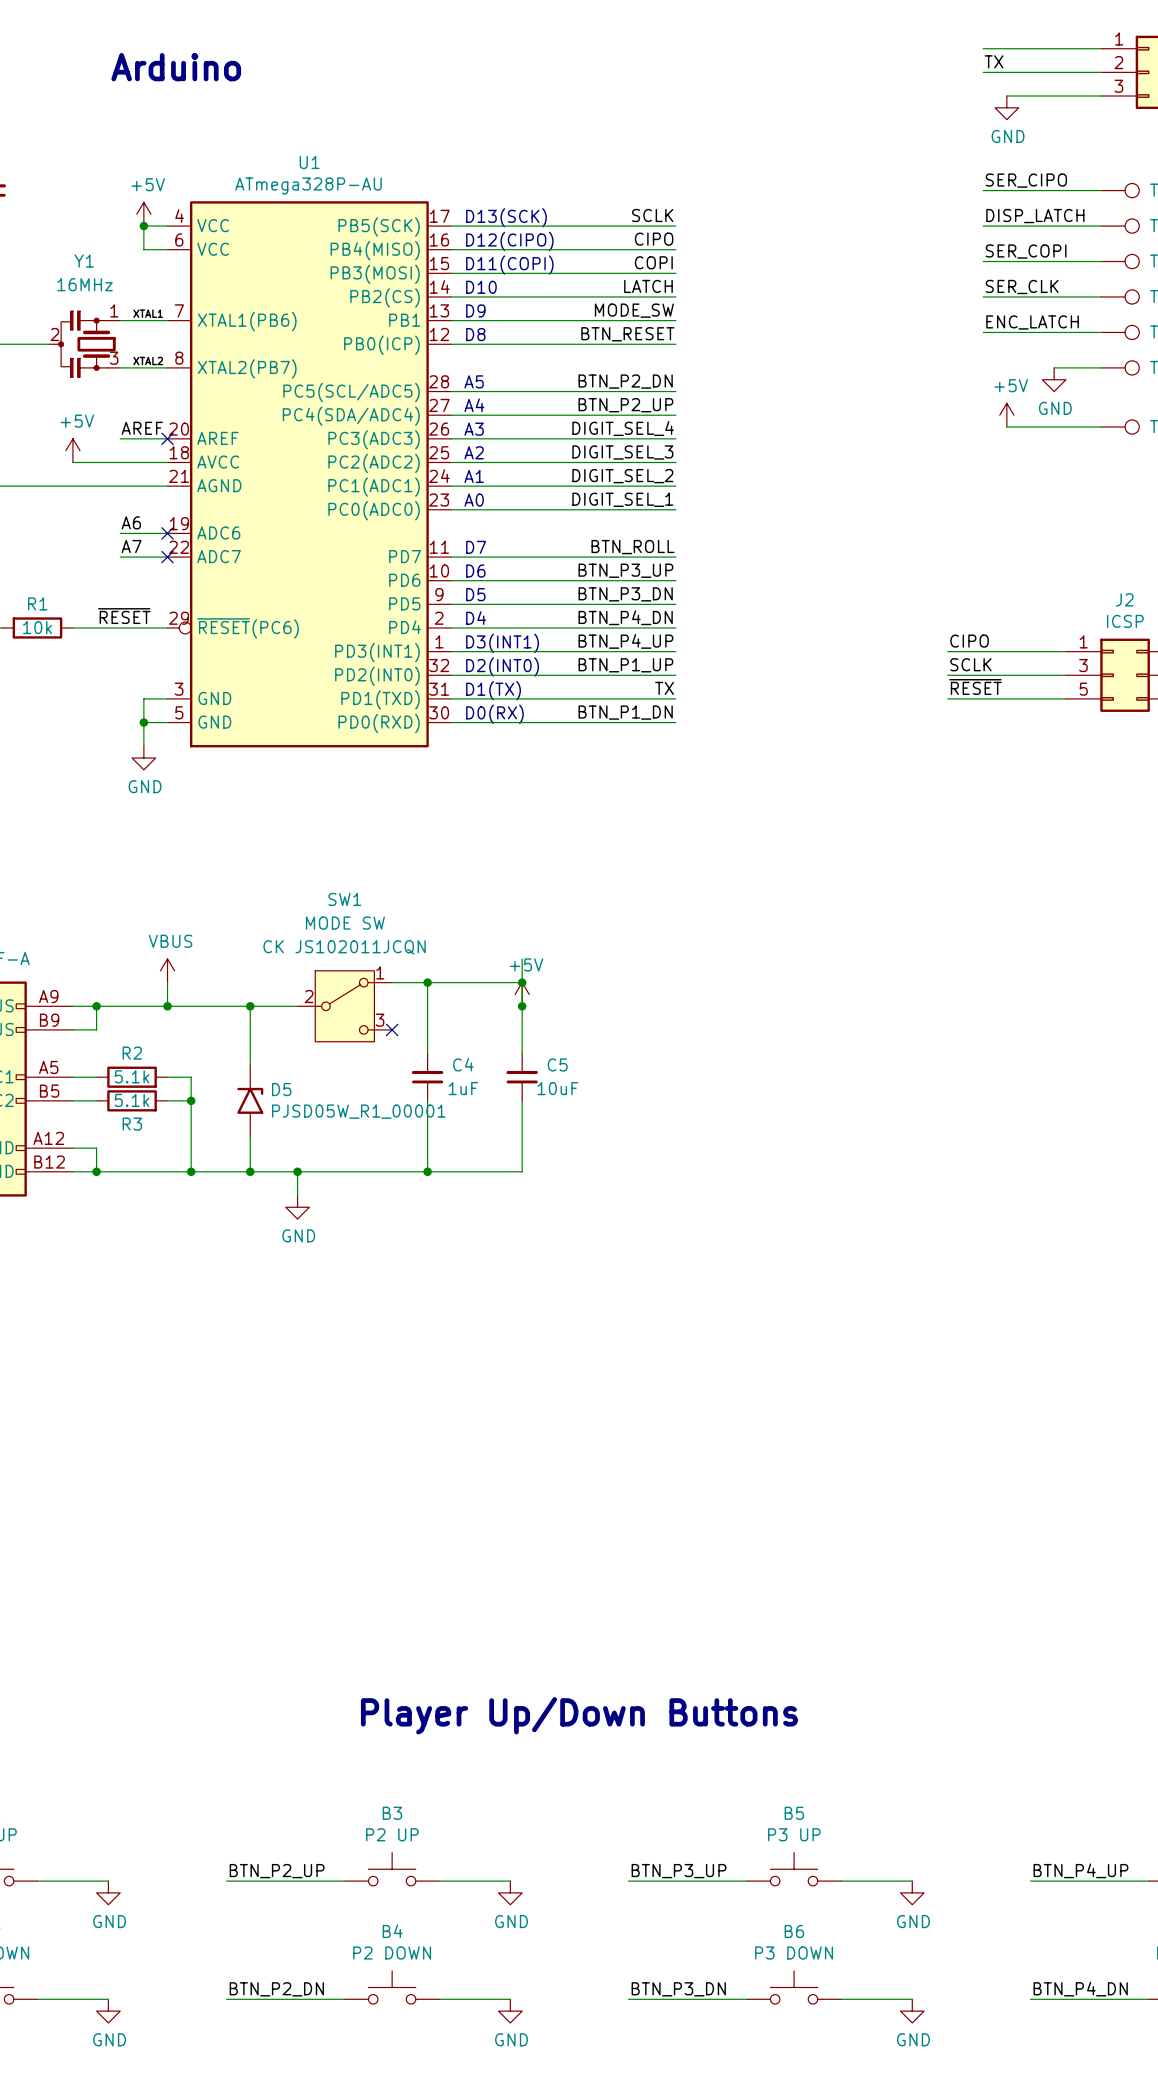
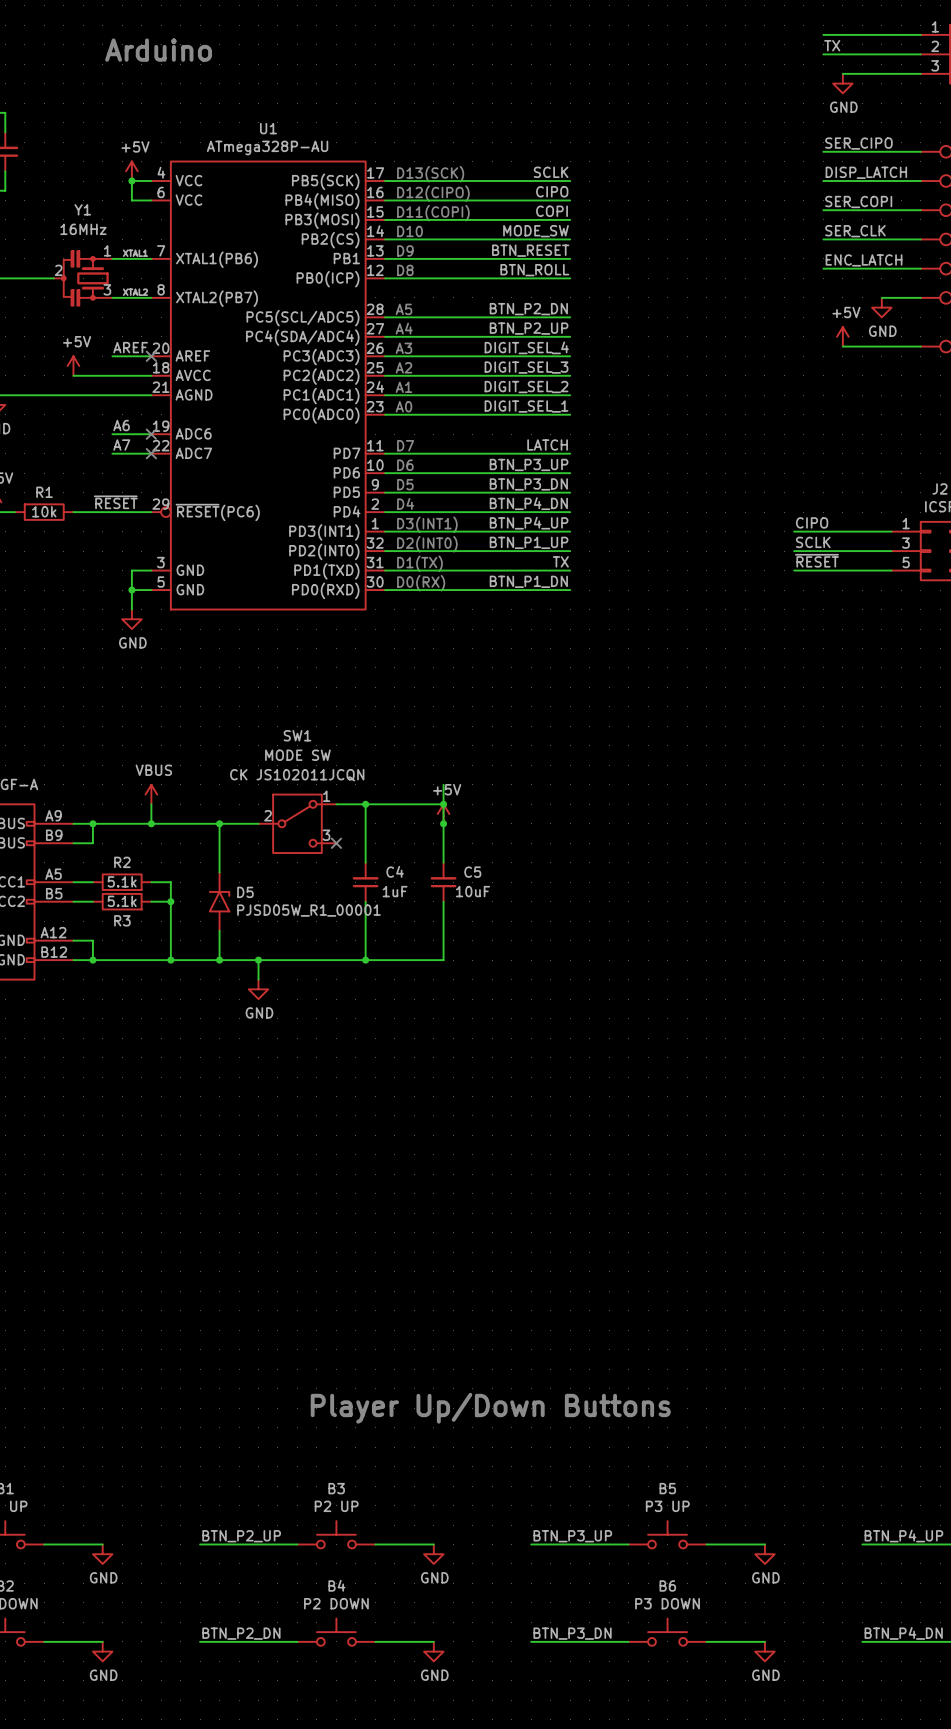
label: LATCH (648, 286) -> MODE_SW (536, 231)
label: MODE_SW (634, 310) -> BTN_RESET (530, 250)
label: BTN_RESET (627, 334) -> BTN_ROLL (534, 270)
label: BTN_ROLL (632, 547) -> LATCH (547, 445)

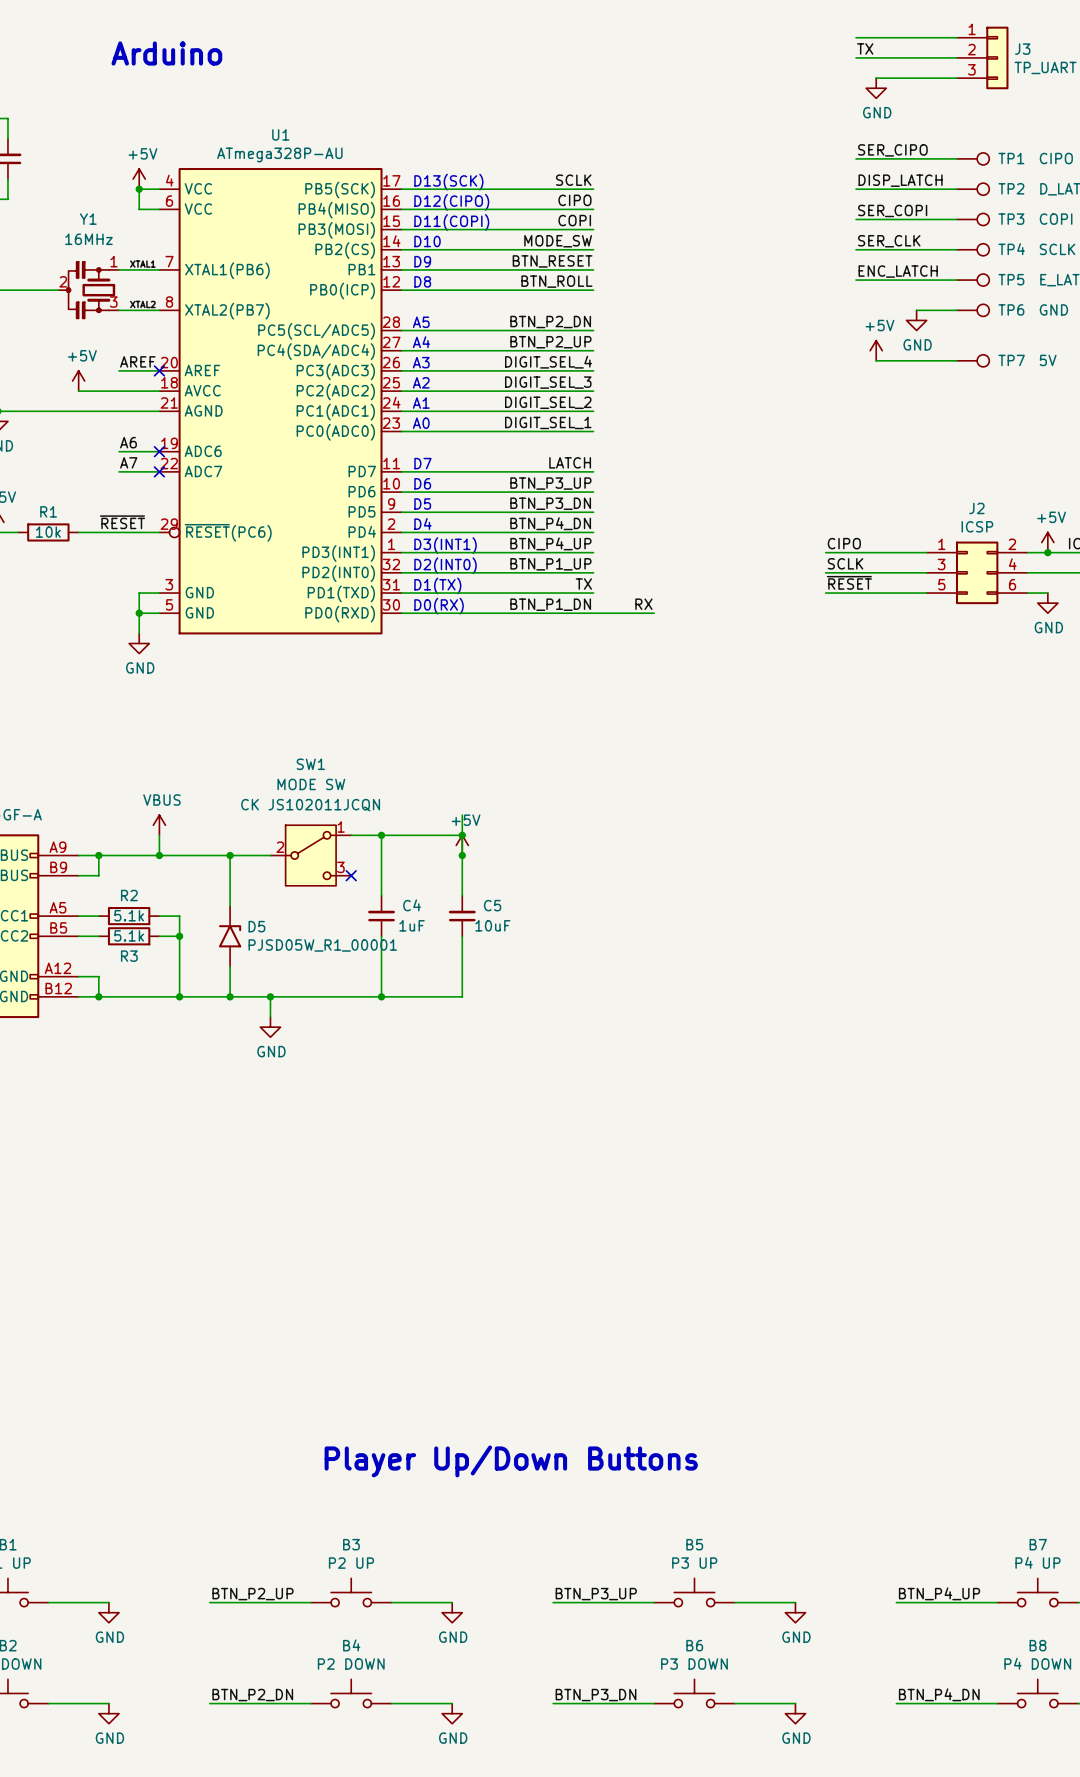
label: none -> RX (643, 604)
wire: none -> (593, 613) (654, 613)

